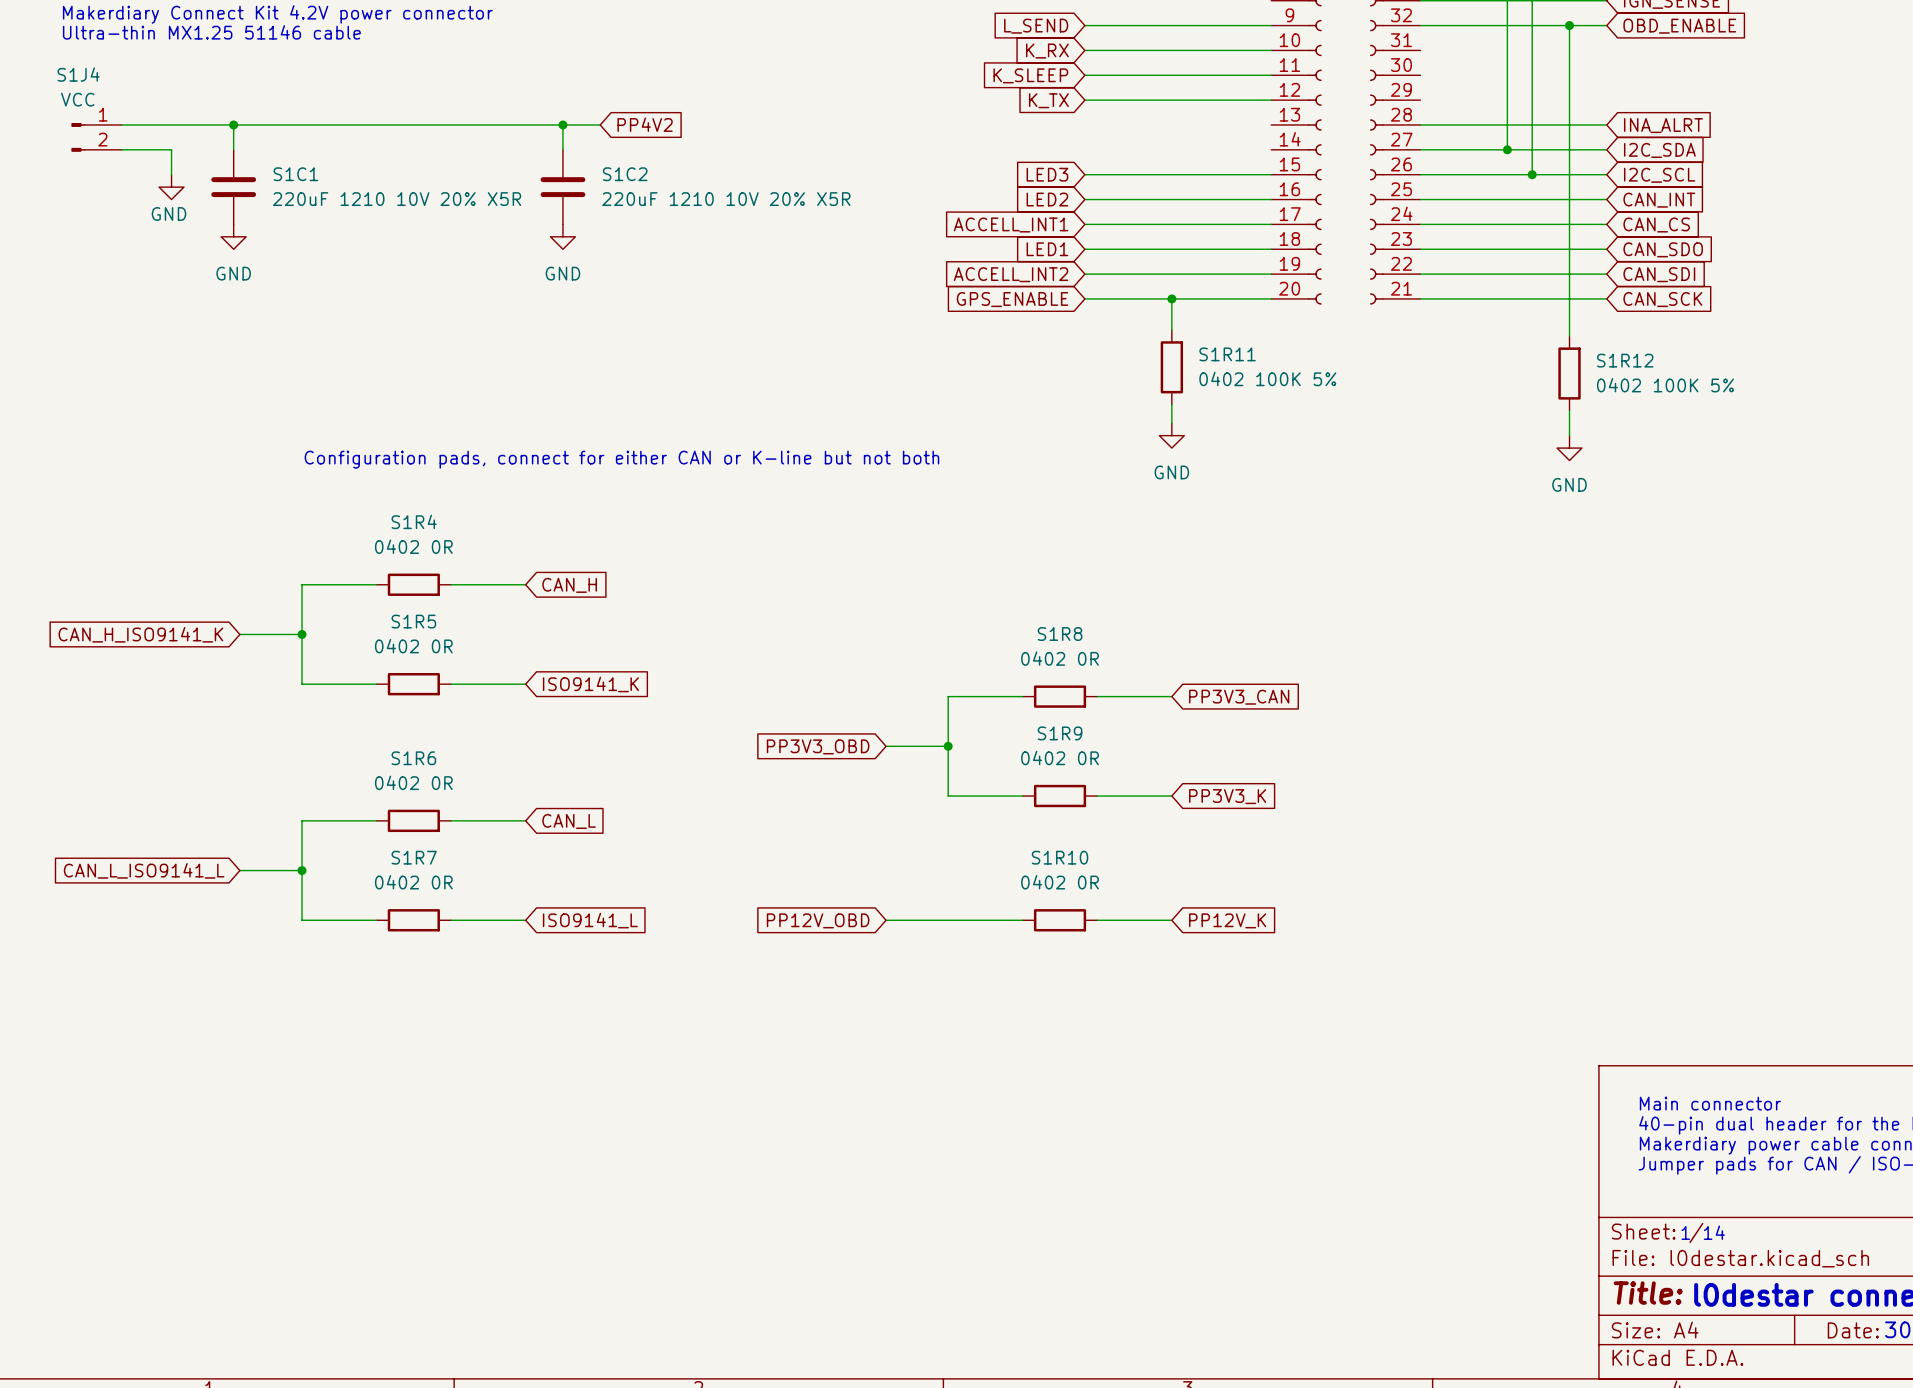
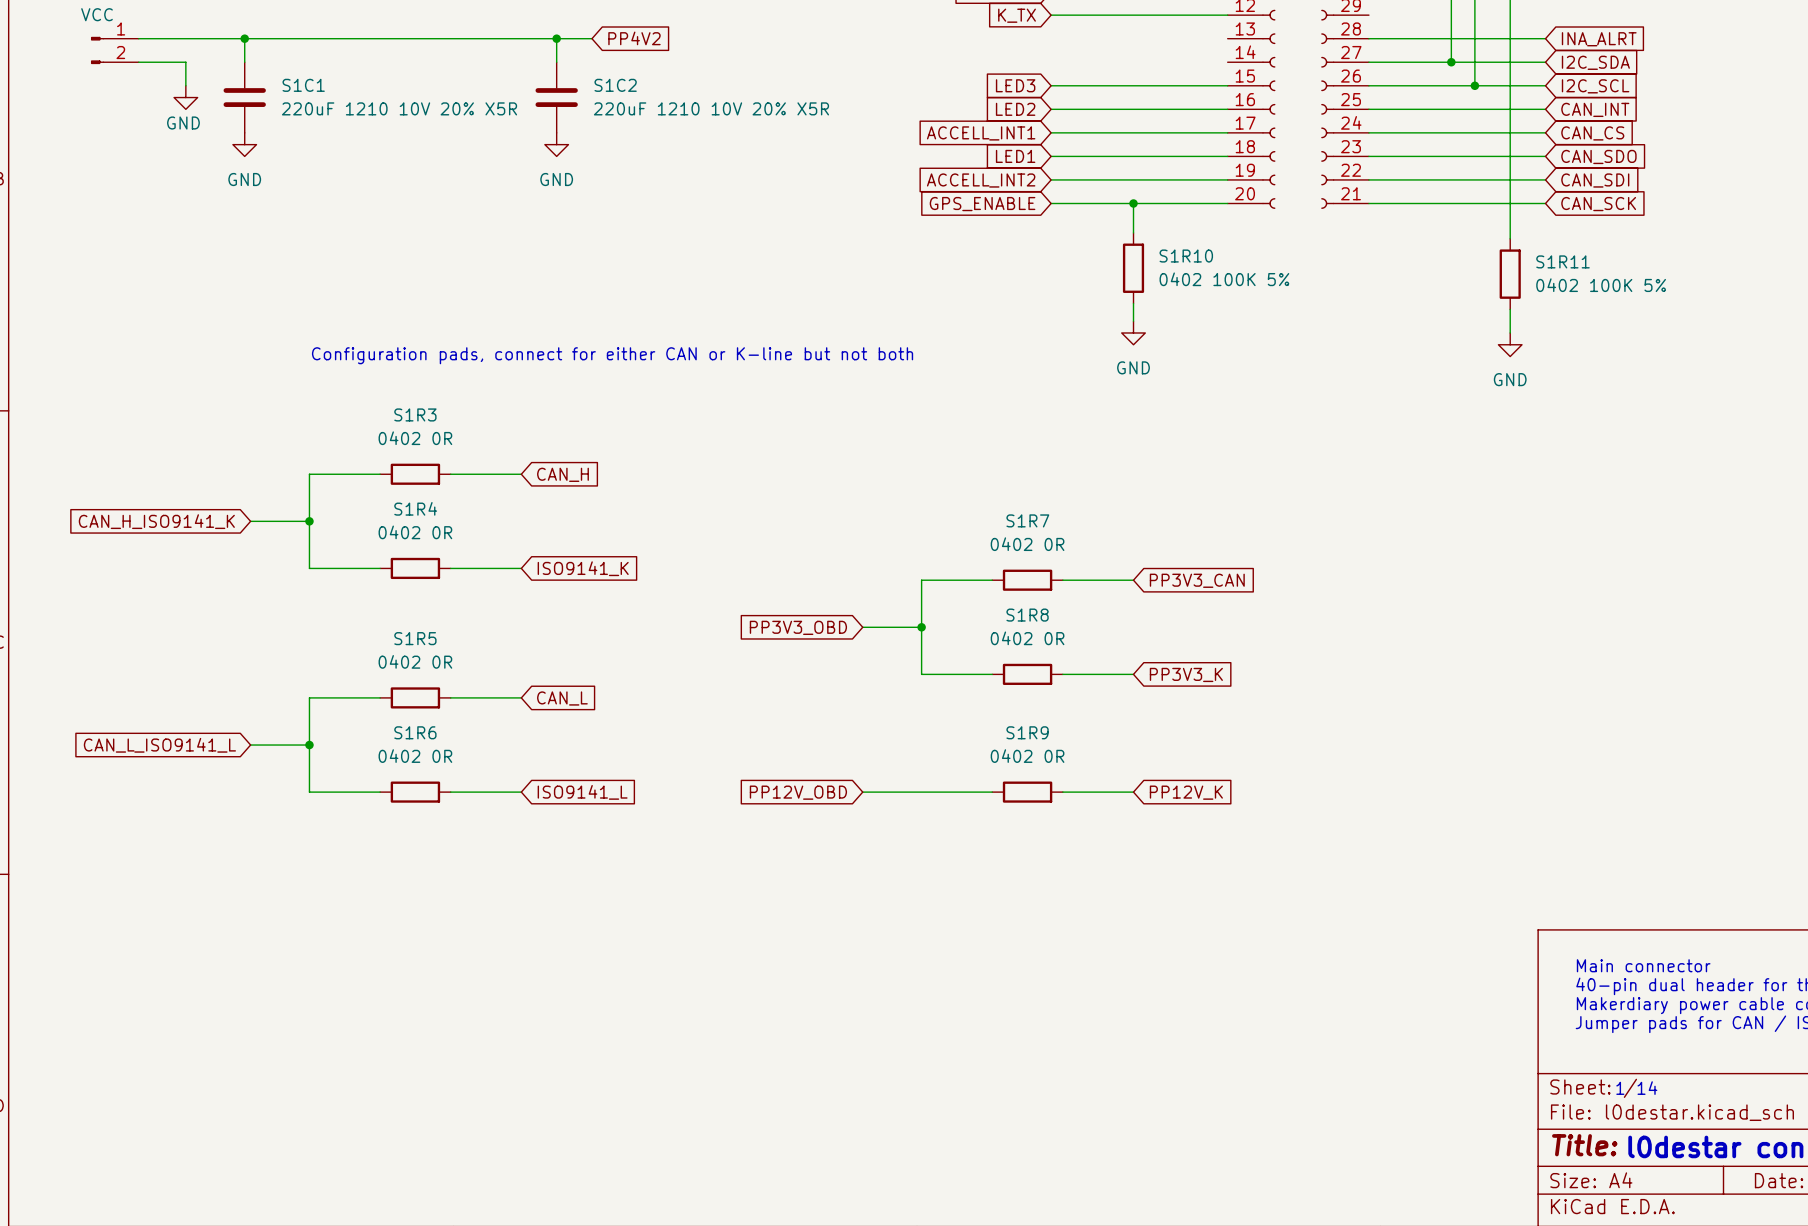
S1R11 name: S1R11 (1227, 354) -> S1R10 (1186, 256)
S1R12 name: S1R12 (1625, 360) -> S1R11 (1562, 261)
S1R4 name: S1R4 (414, 521) -> S1R3 (415, 414)
S1R5 name: S1R5 (413, 621) -> S1R4 (415, 508)
S1R8 name: S1R8 (1060, 634) -> S1R7 (1027, 520)
S1R9 name: S1R9 (1060, 733) -> S1R8 (1027, 615)
S1R6 name: S1R6 (413, 758) -> S1R5 (415, 638)
S1R7 name: S1R7 (414, 857) -> S1R6 (415, 732)
S1R10 name: S1R10 (1060, 857) -> S1R9 (1027, 732)

